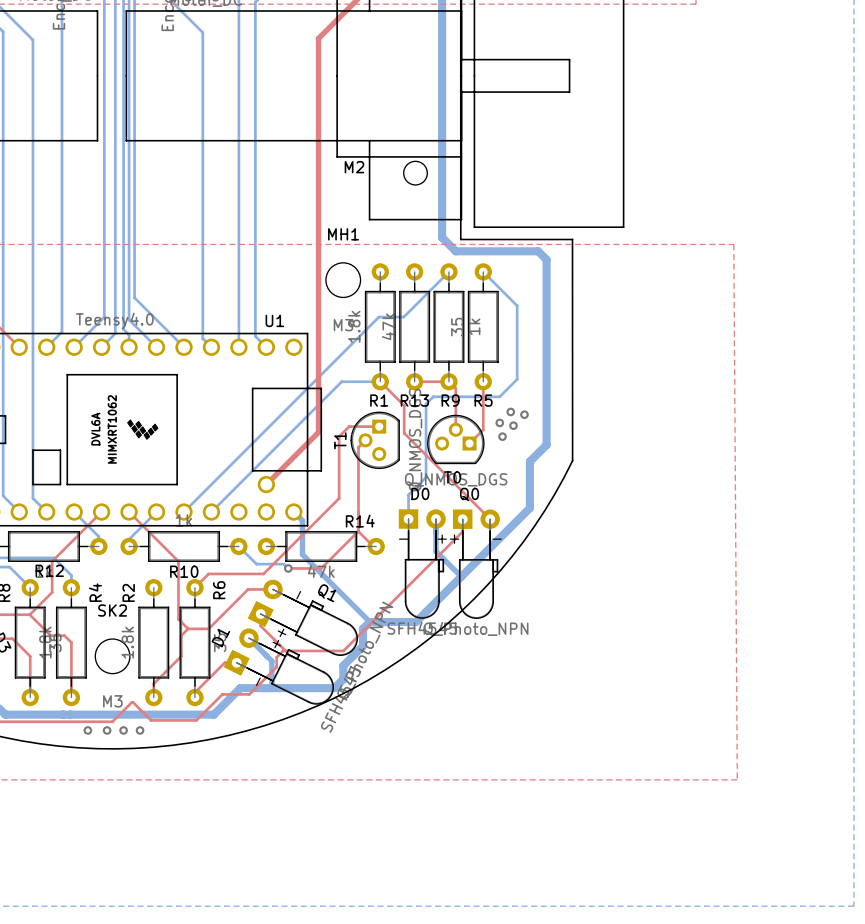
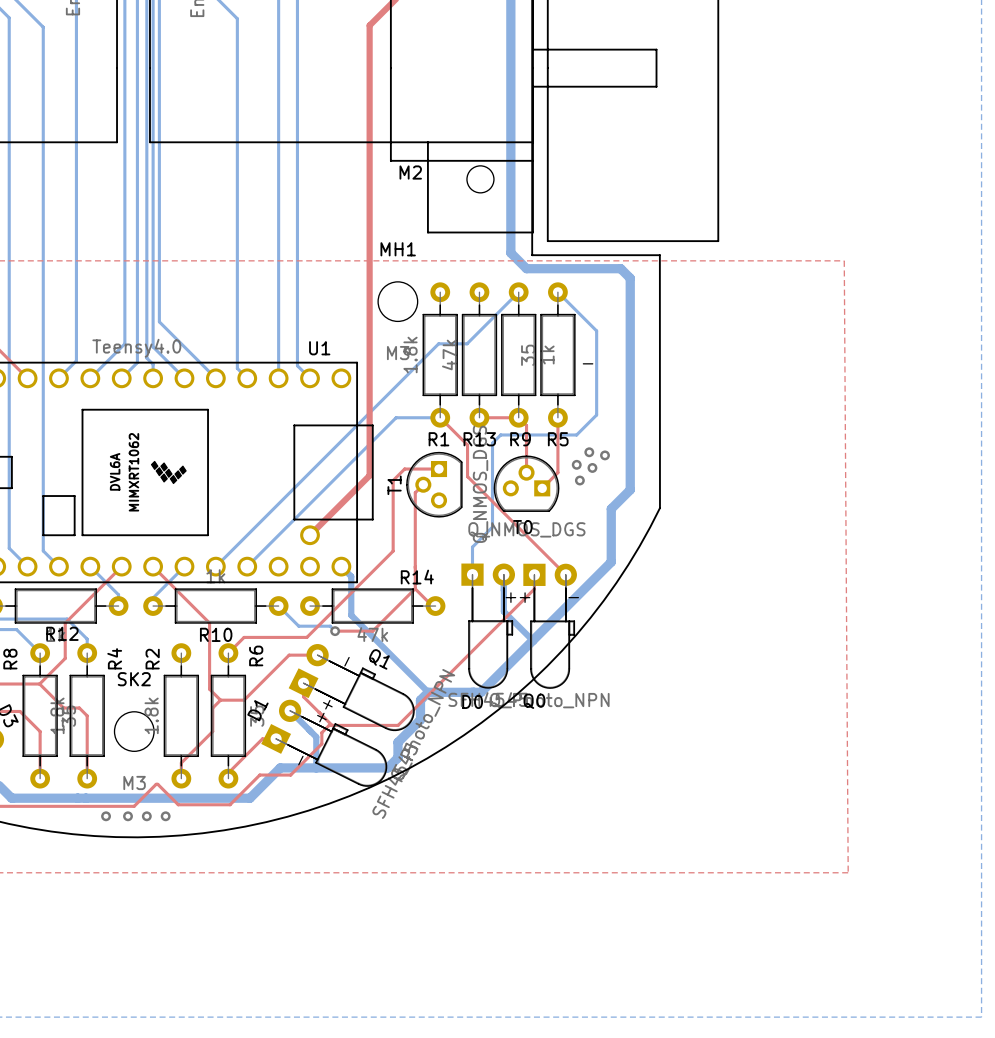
D0 name position: D0 (420, 493) -> D0 (472, 701)
Q0 name position: Q0 (469, 494) -> Q0 (534, 701)
text position: - (403, 539) -> - (588, 363)

